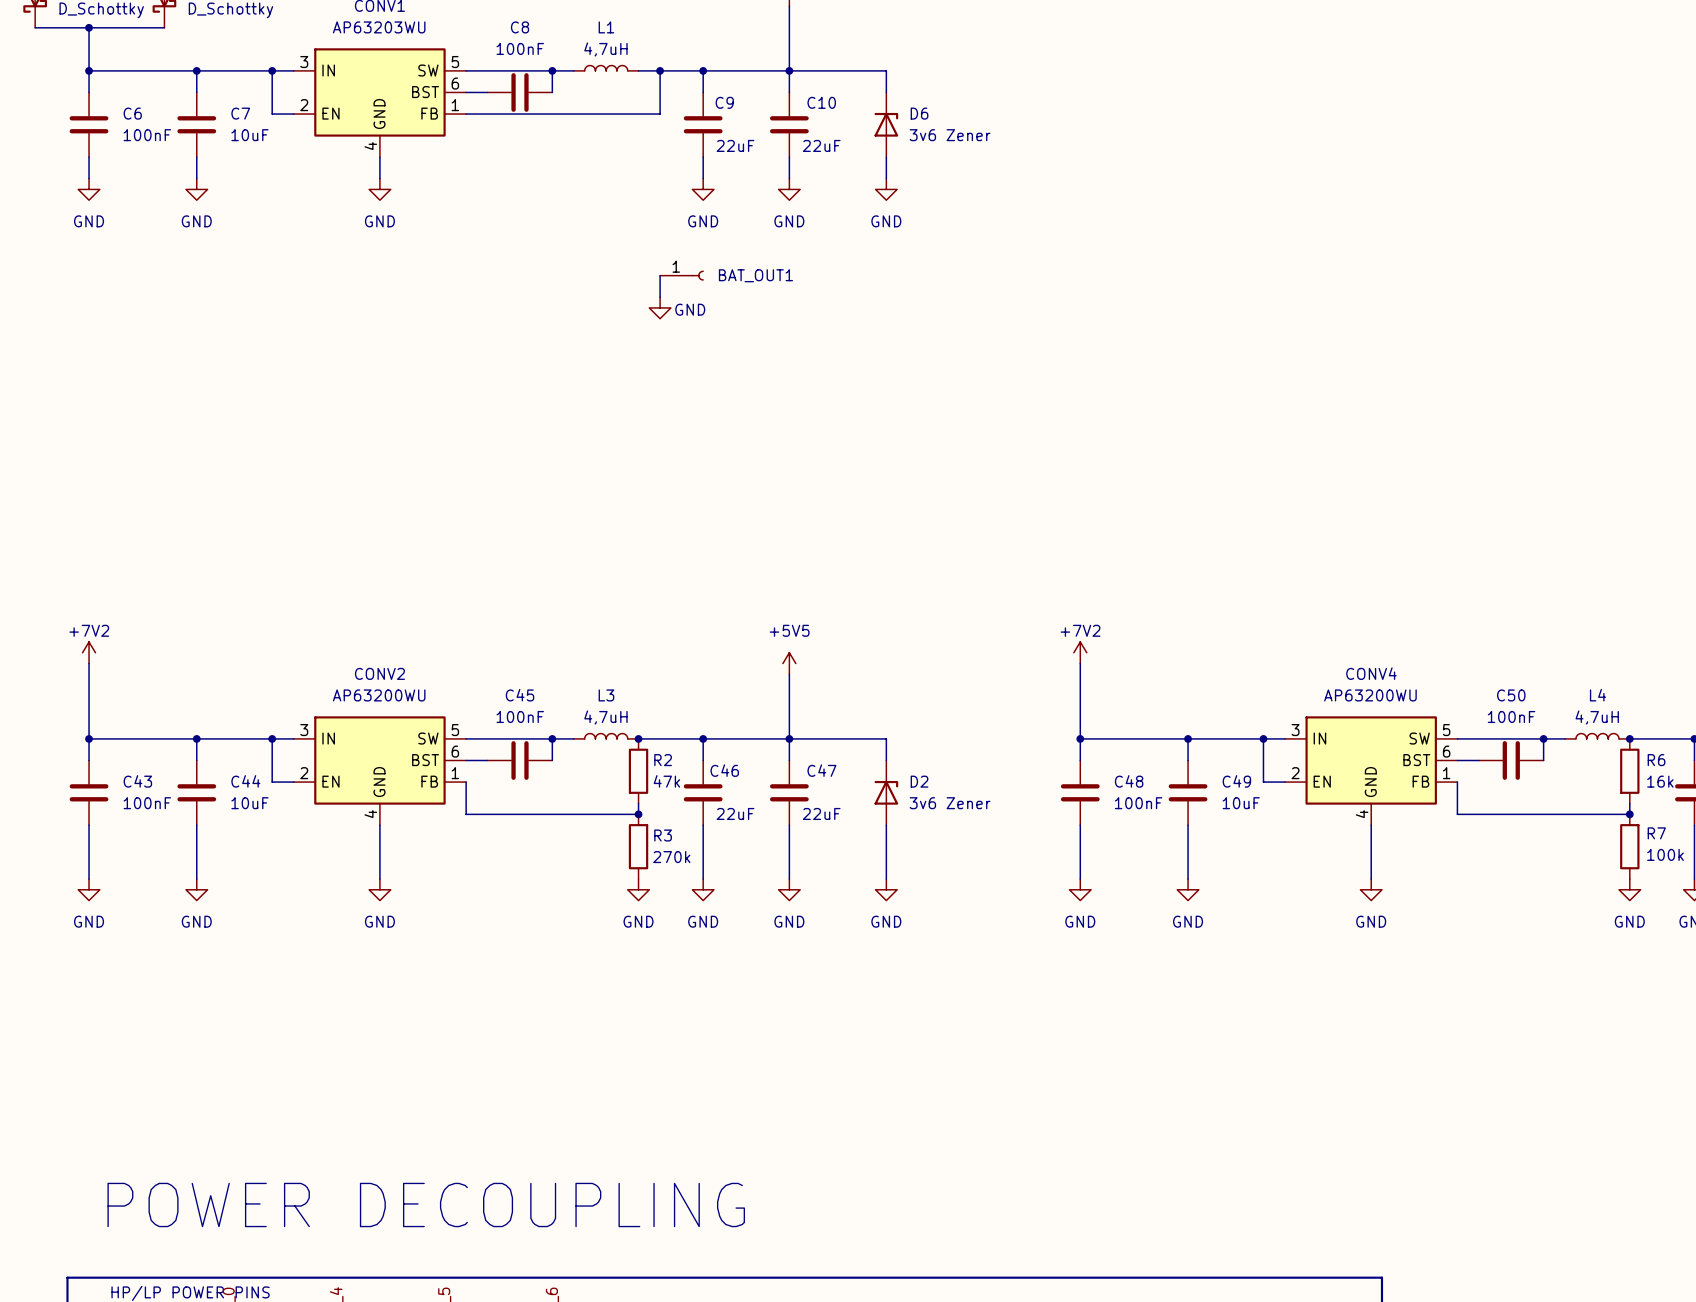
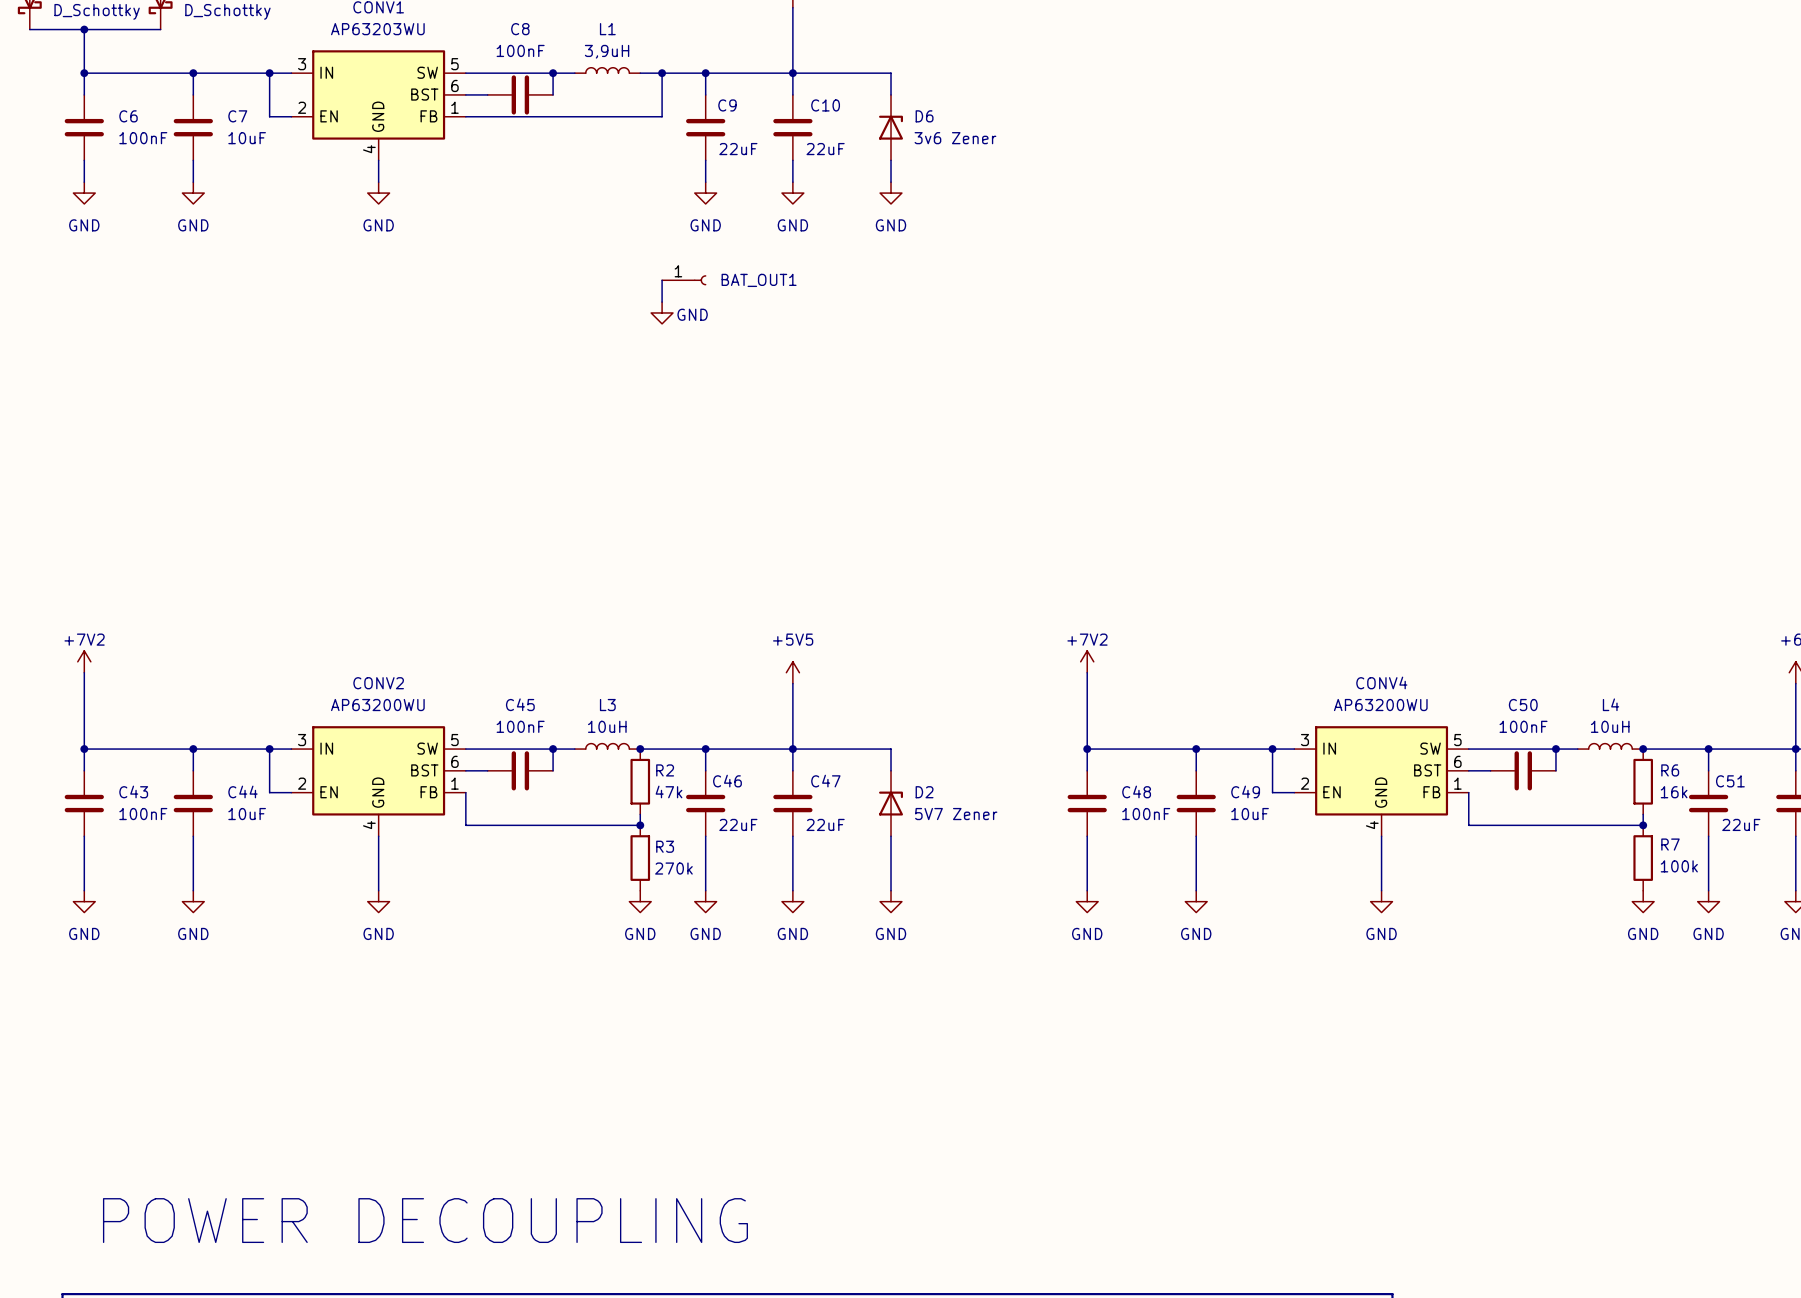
L1 value: 4,7uH (605, 49) -> 3,9uH (607, 51)
L3 value: 4,7uH (605, 717) -> 10uH (607, 726)
L4 value: 4,7uH (1597, 717) -> 10uH (1610, 726)
D2 value: 3v6 Zener (950, 803) -> 5V7 Zener (956, 814)

